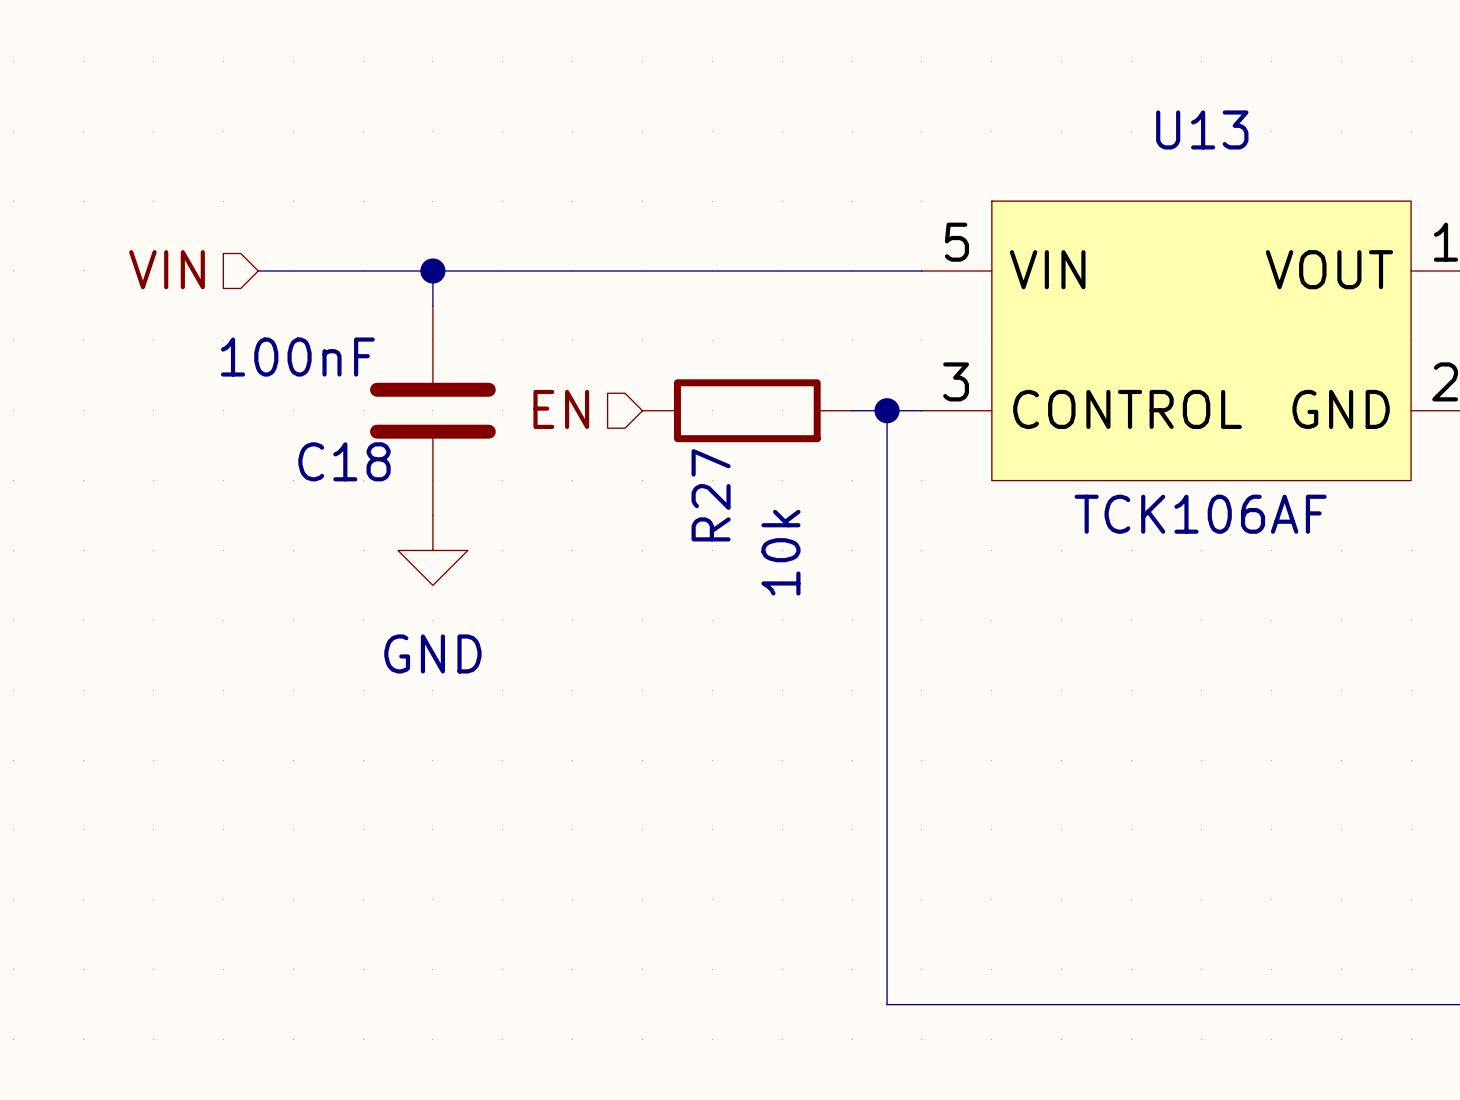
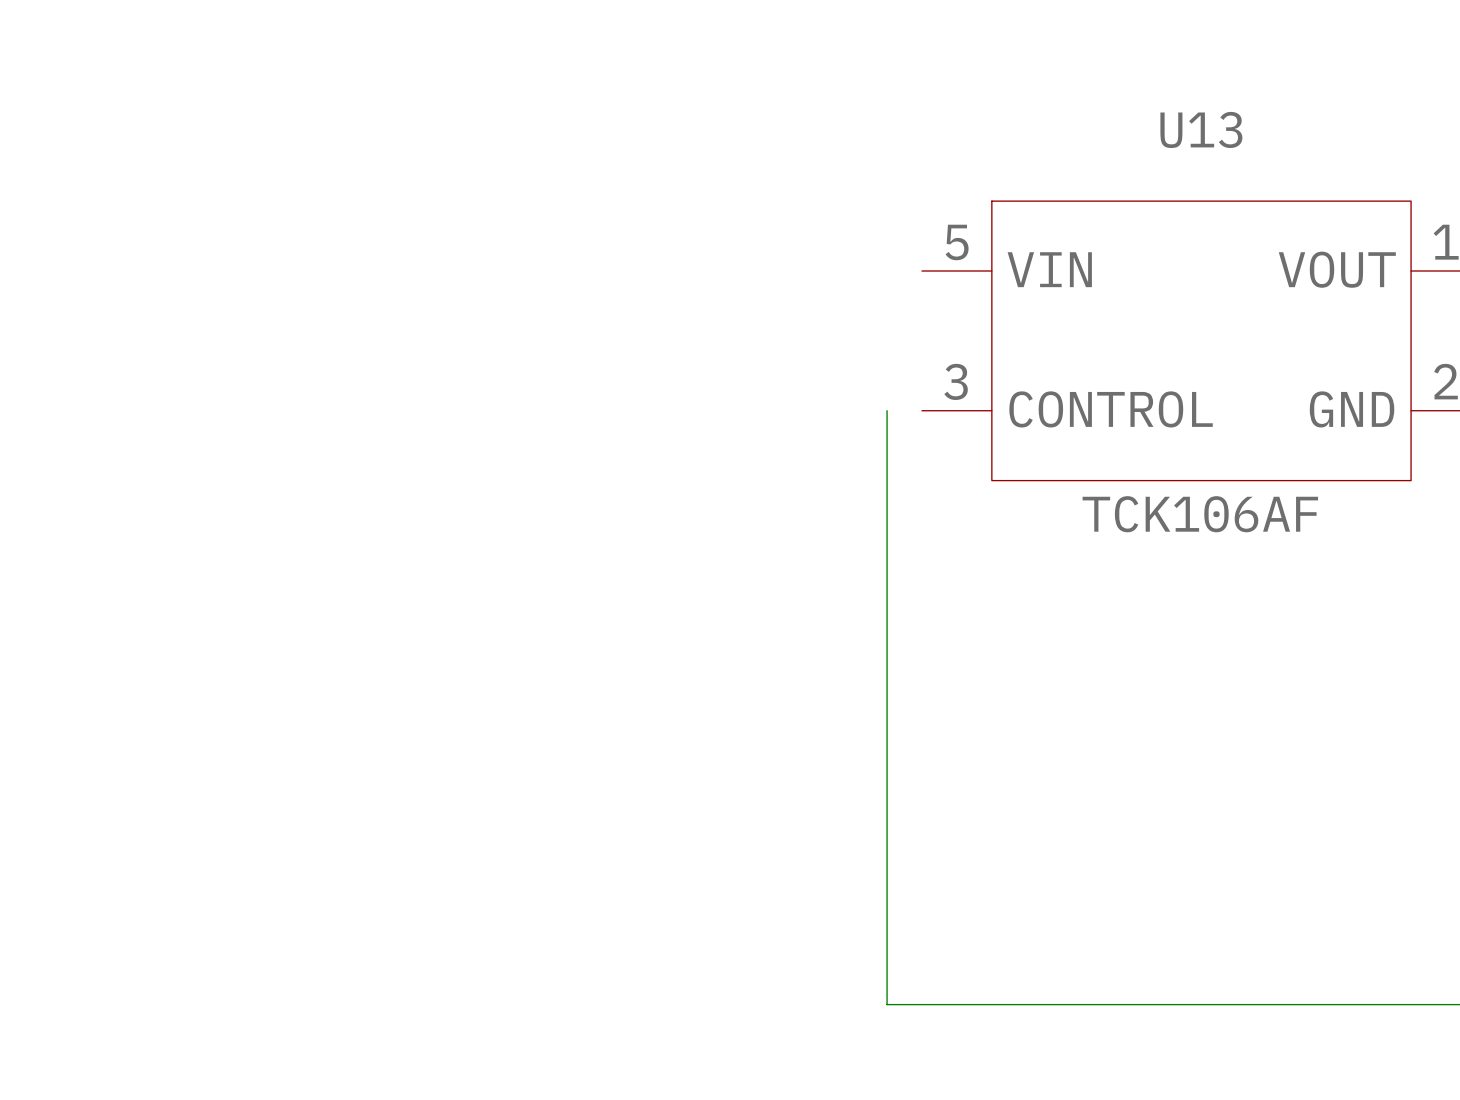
hierarchical label: VIN (167, 269) -> none
wire: (258, 270) (921, 270) -> none
wire: (432, 270) (432, 305) -> none
junction: (432, 270) -> none
hierarchical label: EN (561, 409) -> none
C18: 100nF (432, 410) -> none
R27: 10k (747, 410) -> none
wire: (852, 410) (921, 410) -> none
junction: (887, 410) -> none
power symbol: GND (432, 550) -> none

